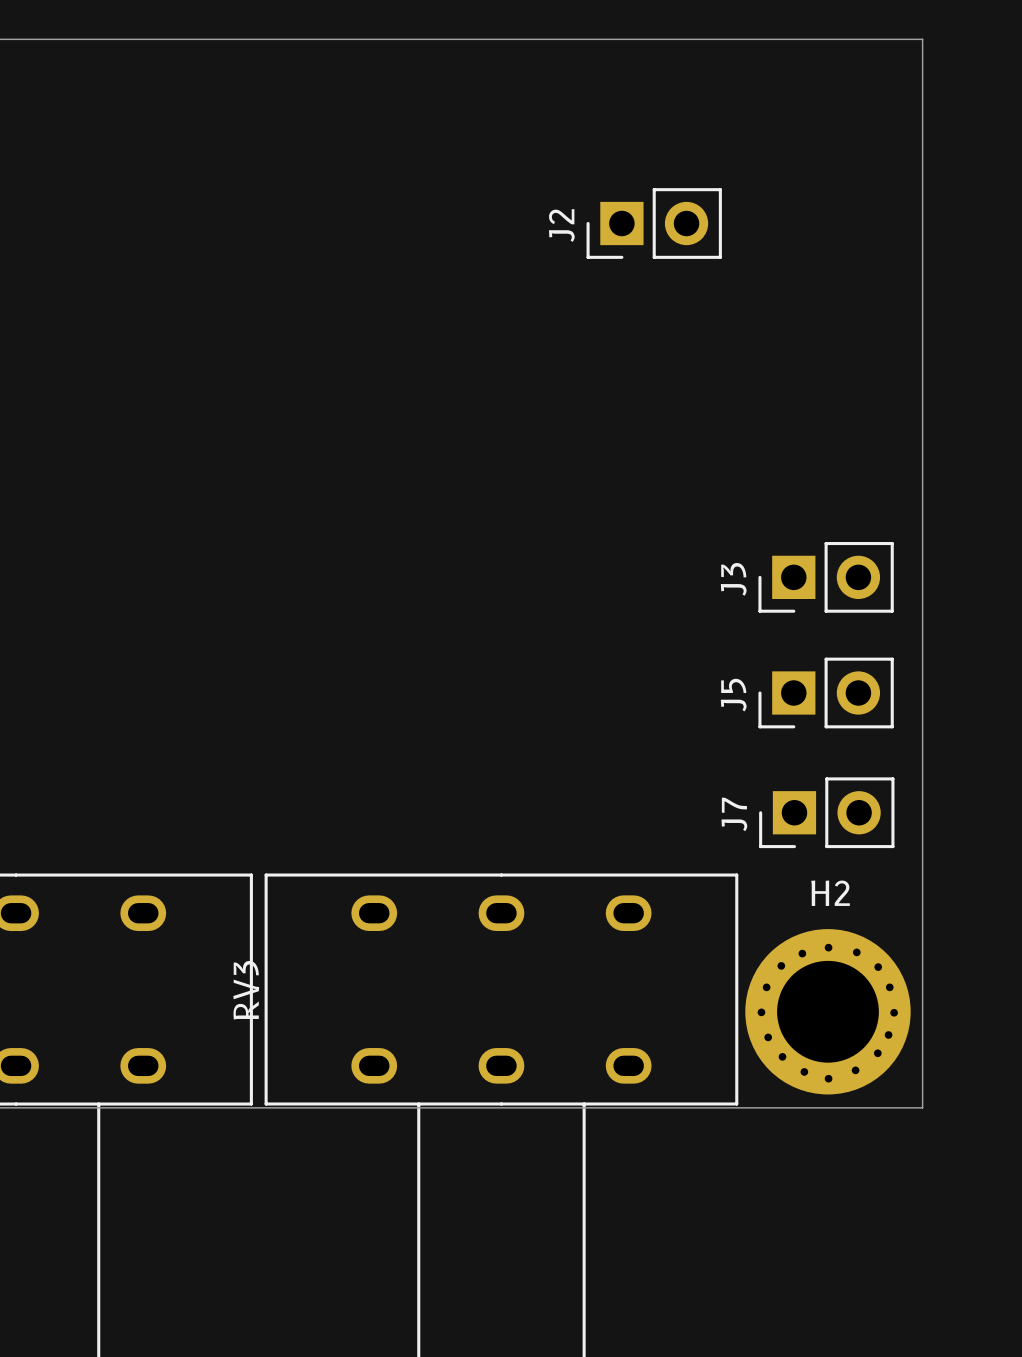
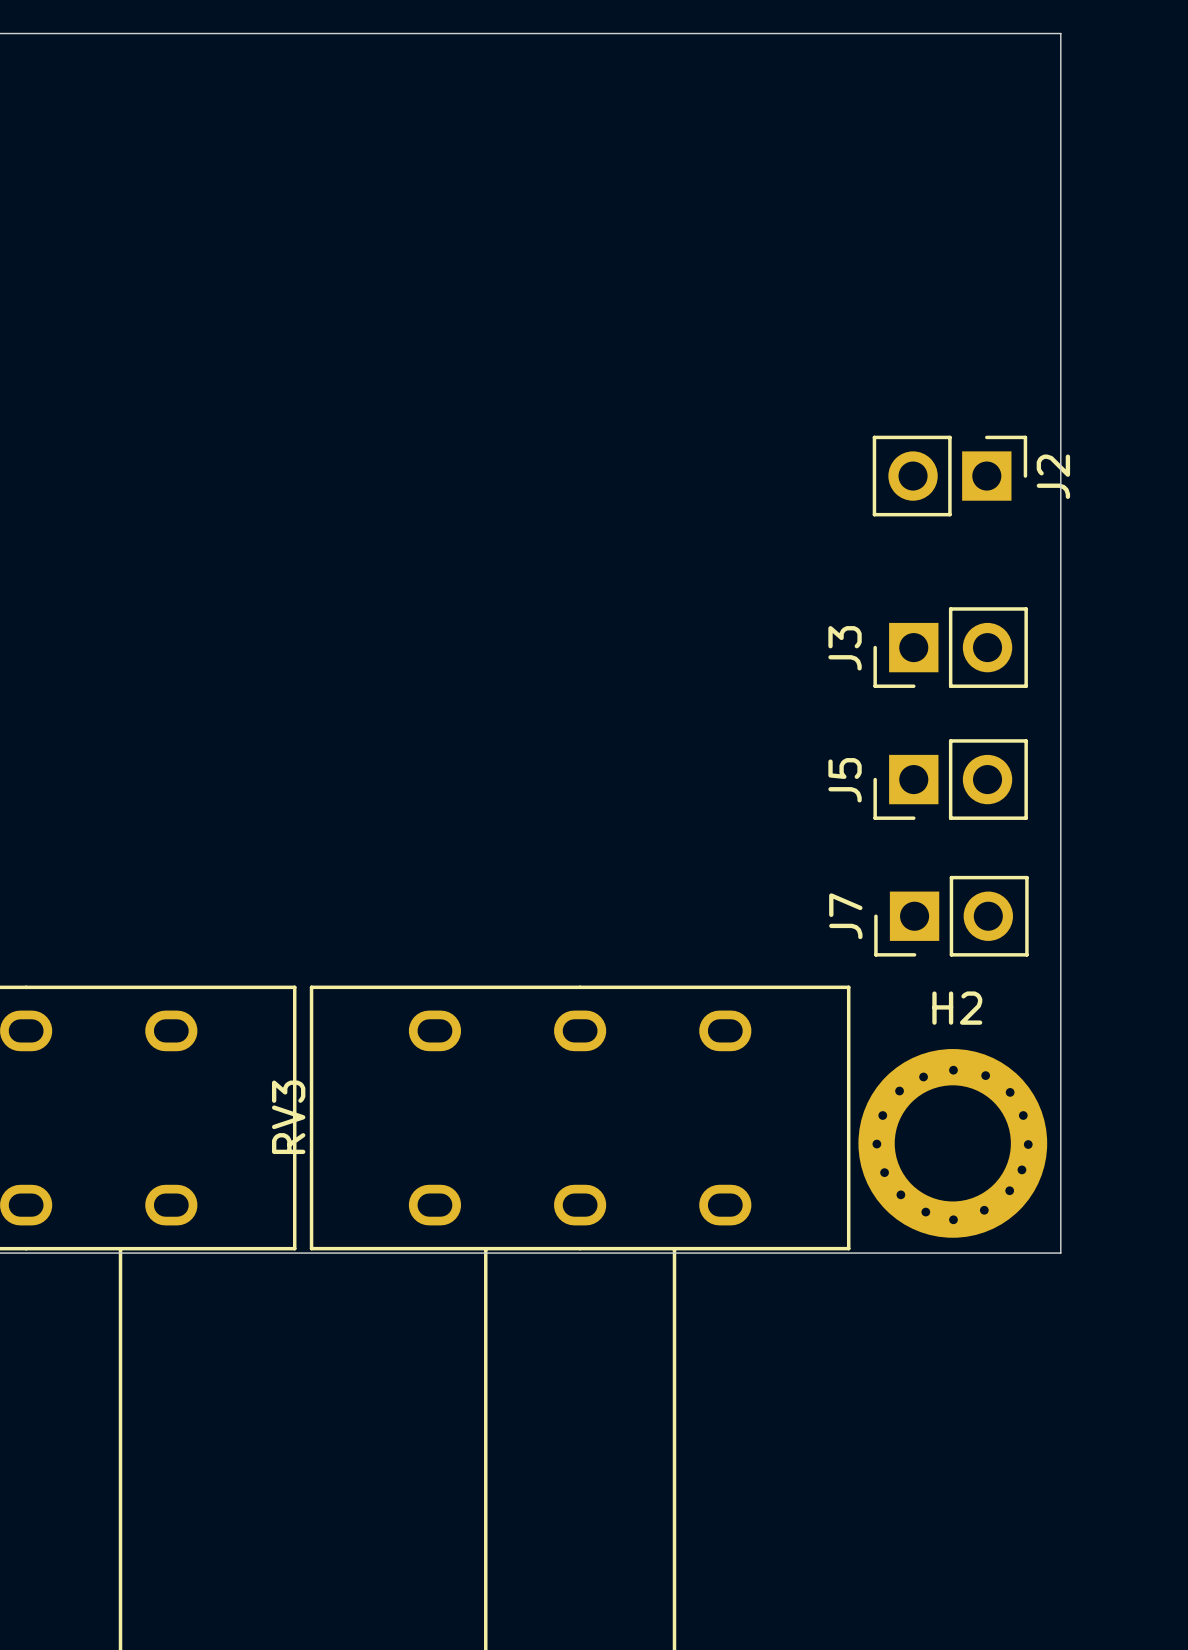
J2 rotation: 0° (654, 223) -> 180° (949, 476)
J2 position: (654, 223) -> (949, 476)

